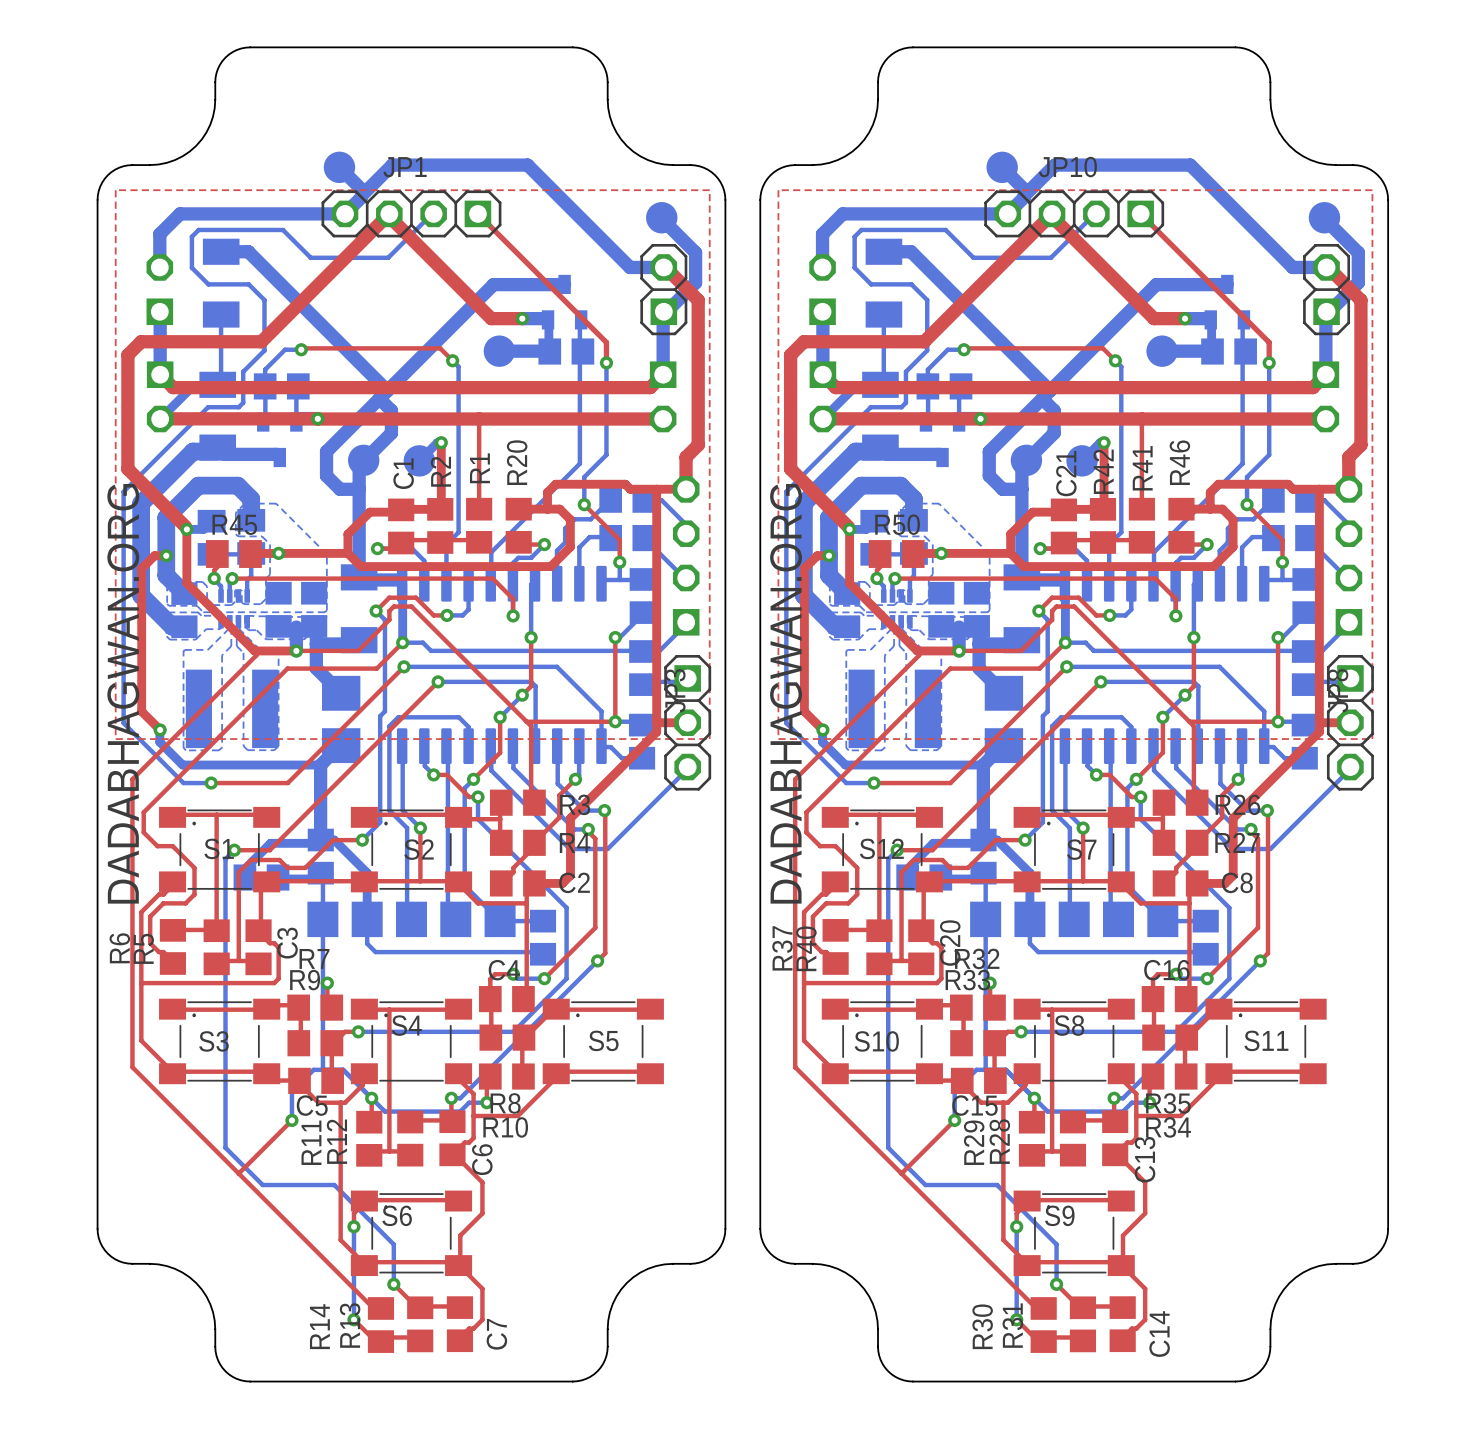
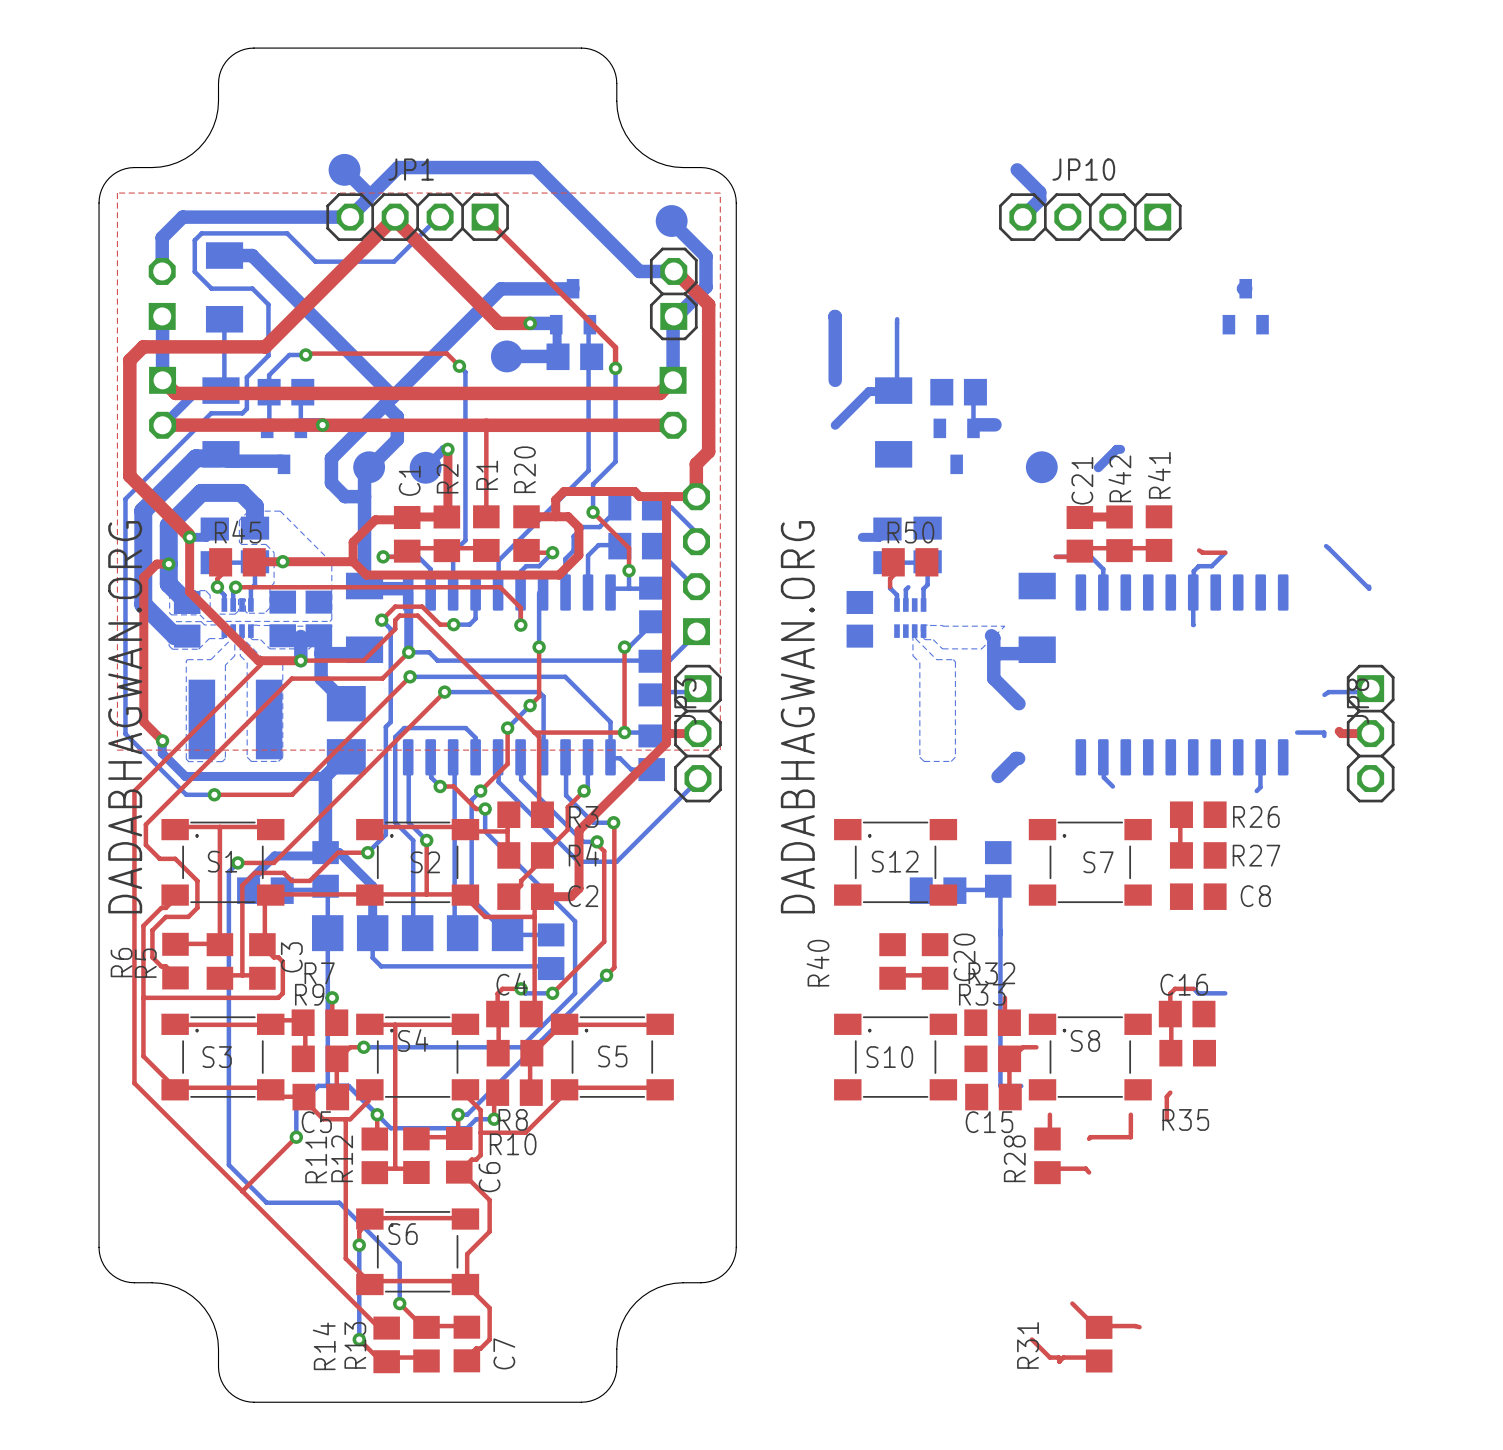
board edge: (912, 47) (1244, 48) (1256, 54) (1267, 68) (1272, 116) (1279, 132) (1289, 145) (1303, 156) (1318, 162) (1366, 167) (1380, 178) (1386, 190) (1387, 1233) (1383, 1246) (1370, 1259) (1357, 1263) (1318, 1266) (1303, 1272) (1289, 1282) (1279, 1296) (1272, 1312) (1267, 1360) (1256, 1374) (1244, 1380) (903, 1380) (891, 1374) (880, 1360) (875, 1312) (869, 1296) (858, 1282) (845, 1272) (829, 1266) (781, 1261) (767, 1250) (761, 1237) (760, 195) (764, 182) (777, 169) (790, 165) (829, 162) (845, 156) (858, 145) (869, 132) (875, 116) (878, 77) (882, 64) (895, 52) (912, 47) -> none
part: (1002, 167) -> none
top zone outline: (778, 190) (778, 739) (1372, 739) (1372, 190) (778, 190) -> none
bottom track: (1024, 195) (1055, 165) (1190, 165) (1292, 267) (1326, 267) -> none
bottom track: (1007, 213) (842, 213) (822, 234) (822, 267) -> none
bottom track: (1096, 213) (1050, 257) (973, 257) (945, 229) (861, 229) (854, 236) (854, 267) (871, 284) (911, 284) (927, 300) (927, 350) (905, 371) (905, 402) (901, 407) (870, 407) (786, 491) (786, 723) (846, 783) (873, 783) -> none
top track: (1140, 213) (1269, 342) (1269, 362) -> none
bottom track: (1324, 217) (1358, 252) (1358, 282) (1329, 311) (1325, 312) (1325, 374) -> none
part: (1324, 217) -> none
bottom track: (883, 251) (911, 251) (1050, 390) -> none
top track: (1326, 267) (1360, 300) (1360, 445) (1348, 457) (1348, 489) (1293, 489) (1288, 484) (1218, 484) (1210, 492) (1210, 509) -> none
part: (883, 283) -> none
bottom track: (1224, 284) (1156, 284) (989, 451) (989, 475) (1002, 489) (1021, 489) -> none
part: (822, 289) -> none
part: (1326, 289) -> none
bottom track: (1185, 318) (1210, 319) (1212, 351) (1162, 351) -> none
top track: (1185, 318) (1154, 318) (1052, 216) (1052, 213) (924, 341) (803, 341) (790, 355) (790, 469) (848, 526) (849, 583) (917, 650) (959, 650) -> none
via: (1185, 318) -> none
bottom track: (1243, 319) (1242, 349) (1245, 351) (1242, 354) (1242, 463) (1154, 552) (1153, 583) -> none
bottom track: (964, 349) (947, 349) (927, 369) (928, 420) (925, 422) -> none
top track: (964, 349) (1102, 348) (1115, 360) -> none
via: (964, 349) -> none
part: (1162, 351) -> none
part: (1229, 351) -> none
bottom track: (1115, 360) (1121, 366) (1121, 532) (1109, 544) (1109, 583) -> none
via: (1115, 360) -> none
bottom track: (1269, 362) (1269, 454) (1247, 477) (1247, 504) -> none
via: (1269, 362) -> none
top track: (822, 374) (835, 387) (1312, 387) (1325, 374) -> none
part: (822, 396) -> none
part: (1325, 396) -> none
bottom track: (1042, 398) (1054, 410) (1054, 433) (1026, 460) (1028, 460) (1021, 467) (1021, 577) (1025, 579) (1060, 579) (1065, 584) (1065, 642) (1085, 642) (1093, 650) (1322, 650) (1348, 622) -> none
top track: (823, 418) (980, 418) -> none
via: (980, 418) -> none
top track: (980, 419) (1325, 419) -> none
top track: (1141, 419) (1141, 509) -> none
top track: (1104, 442) (1104, 505) (1100, 509) (1065, 509) (1061, 512) (1032, 512) (1010, 534) (1010, 553) -> none
via: (1104, 442) -> none
bottom track: (942, 457) (940, 454) (886, 454) (880, 447) (879, 451) (855, 451) (803, 503) (803, 595) (835, 626) (847, 626) (838, 626) -> none
part: (1082, 460) -> none
top track: (1319, 489) (1319, 732) (1233, 818) (1233, 875) (1225, 883) (1197, 883) (1189, 890) (1189, 996) (1186, 999) -> none
bottom track: (1273, 499) (1253, 519) (1237, 519) (1227, 528) (1227, 542) (1219, 550) (1219, 583) -> none
part: (1289, 499) -> none
bottom track: (1306, 499) (1324, 500) (1348, 524) (1348, 533) -> none
bottom zone outline: (907, 503) (938, 503) (989, 554) (989, 610) (987, 612) (866, 612) (859, 605) (831, 605) (829, 604) (829, 584) (832, 581) (865, 581) (869, 586) (869, 599) (875, 605) (894, 605) (897, 601) (897, 590) (904, 590) (904, 602) (906, 604) (923, 604) (928, 598) (928, 578) (932, 574) (932, 544) (924, 536) (900, 536) (898, 534) (898, 512) (907, 503) -> none
top track: (1247, 504) (1282, 540) (1282, 562) -> none
via: (1247, 504) -> none
top track: (1181, 509) (1222, 509) (1233, 519) (1233, 547) (1213, 566) (1023, 566) (1010, 553) -> none
bottom track: (913, 520) (913, 499) (900, 485) (861, 485) (829, 517) (829, 575) (847, 593) -> none
R46: (1181, 525) -> none
via: (849, 529) -> none
bottom track: (1273, 538) (1252, 537) (1242, 547) (1242, 583) -> none
part: (1289, 538) -> none
via: (1207, 544) -> none
via: (1040, 548) -> none
via: (941, 553) -> none
top track: (829, 555) (817, 555) (804, 568) (804, 711) (822, 729) -> none
via: (829, 555) -> none
part: (1348, 555) -> none
bottom track: (1282, 562) (1282, 579) -> none
via: (1282, 562) -> none
via: (876, 578) -> none
top track: (894, 578) (1155, 578) (1175, 599) (1175, 615) -> none
via: (894, 578) -> none
bottom track: (1305, 579) (1264, 579) (1264, 583) -> none
bottom track: (1131, 583) (1131, 609) (1125, 615) (1109, 615) -> none
bottom track: (1197, 583) (1193, 584) (1193, 637) -> none
part: (1305, 596) -> none
part: (941, 609) -> none
part: (976, 609) -> none
bottom track: (1038, 611) (1047, 619) (1047, 711) (1042, 716) (1042, 822) (1025, 840) -> none
top track: (1038, 611) (1052, 597) (1078, 597) (1096, 615) (1109, 615) -> none
via: (1038, 611) -> none
bottom zone outline: (832, 612) (860, 612) (864, 615) (885, 615) (885, 626) (882, 629) (868, 629) (858, 639) (832, 639) (829, 636) (829, 615) (832, 612) -> none
bottom track: (1305, 612) (1282, 637) (1278, 637) -> none
via: (1109, 615) -> none
via: (1175, 615) -> none
bottom zone outline: (890, 616) (894, 616) (894, 646) (884, 655) (884, 747) (881, 750) (848, 750) (846, 747) (846, 651) (870, 649) (890, 629) (890, 616) -> none
bottom track: (959, 627) (959, 650) -> none
top track: (1193, 637) (1193, 686) (1185, 695) -> none
via: (1193, 637) -> none
top track: (1278, 637) (1278, 721) (1189, 721) -> none
via: (1278, 637) -> none
top track: (1065, 642) (1039, 668) (950, 668) (806, 812) (806, 832) (820, 846) (835, 846) (857, 867) (857, 894) (848, 903) (826, 903) (812, 916) (812, 943) (821, 952) (826, 952) (835, 963) -> none
via: (1065, 642) -> none
top track: (919, 650) (919, 655) (795, 779) (795, 1067) (1034, 1306) (1043, 1306) (1043, 1308) -> none
top track: (959, 650) (1021, 650) (1052, 619) (1052, 611) (1056, 606) (1074, 606) (1193, 726) (1193, 801) (1197, 802) -> none
via: (959, 650) -> none
bottom track: (1066, 666) (1219, 666) (1264, 711) (1264, 746) (1273, 747) (1284, 758) (1304, 758) -> none
top track: (1066, 666) (950, 783) (873, 783) -> none
via: (1066, 666) -> none
part: (1304, 668) -> none
bottom track: (1100, 681) (1193, 681) (1198, 686) (1197, 746) -> none
top track: (1100, 681) (932, 850) (897, 850) -> none
via: (1100, 681) -> none
bottom track: (1185, 695) (1162, 717) -> none
via: (1185, 695) -> none
part: (894, 708) -> none
top track: (1162, 717) (1162, 752) (1136, 779) -> none
via: (1162, 717) -> none
part: (1003, 719) -> none
via: (1278, 721) -> none
bottom track: (822, 729) (822, 742) (845, 765) (983, 765) (983, 839) -> none
via: (822, 729) -> none
part: (1304, 741) -> none
bottom track: (1064, 746) (1065, 810) (1083, 828) -> none
bottom track: (1109, 746) (1110, 914) (1118, 919) -> none
bottom track: (1131, 746) (1131, 726) (1121, 717) (1060, 717) (1052, 726) (1052, 810) (1069, 828) (1069, 916) (1074, 919) -> none
bottom track: (1153, 746) (1154, 770) (1232, 849) (1270, 849) (1350, 767) -> none
bottom track: (1175, 746) (1176, 768) (1237, 829) (1251, 829) -> none
bottom track: (1219, 746) (1220, 783) (1247, 810) (1267, 810) -> none
top track: (1096, 774) (1109, 774) (1131, 797) (1140, 797) -> none
via: (1096, 774) -> none
bottom track: (1136, 779) (1127, 788) (1127, 885) (1162, 921) (1205, 921) -> none
via: (1136, 779) -> none
top track: (1238, 779) (1222, 795) (1222, 817) (1198, 841) (1198, 845) (1176, 867) (1176, 872) (1164, 883) -> none
via: (1238, 779) -> none
via: (873, 783) -> none
bottom track: (1140, 797) (1140, 819) (1229, 907) (1229, 978) (1176, 1031) (1021, 1031) -> none
via: (1140, 797) -> none
top track: (1267, 810) (1268, 953) (1260, 960) -> none
via: (1267, 810) -> none
top track: (879, 814) (879, 929) -> none
top track: (835, 817) (839, 814) (928, 814) (929, 817) -> none
top track: (1027, 817) (1029, 814) (1118, 814) (1123, 819) (1162, 819) -> none
top track: (1083, 828) (1083, 881) -> none
via: (1083, 828) -> none
top track: (1251, 829) (1258, 838) (1258, 927) (1207, 978) -> none
via: (1251, 829) -> none
top track: (1025, 840) (995, 840) (967, 867) (950, 867) (942, 860) (913, 860) (901, 872) (901, 960) -> none
via: (1025, 840) -> none
bottom track: (897, 850) (888, 859) (888, 1147) (925, 1185) (997, 1185) (1056, 1244) (1056, 1284) -> none
via: (897, 850) -> none
bottom track: (907, 877) (907, 868) (933, 843) (980, 843) (983, 840) (996, 840) (1029, 872) (1029, 943) (1038, 952) (1202, 952) (1205, 954) -> none
top track: (835, 881) (835, 885) (826, 894) (821, 894) (804, 912) (804, 1040) (835, 1073) (839, 1071) (928, 1071) (936, 1080) (962, 1080) (963, 1084) (981, 1102) (1007, 1102) (1025, 1084) (1027, 1073) -> none
top track: (1189, 903) (1140, 903) (1118, 881) (932, 881) (929, 881) (923, 890) (923, 929) (921, 930) (932, 943) (936, 943) (941, 947) (941, 978) (936, 983) (804, 983) -> none
part: (1074, 919) -> none
top track: (879, 929) (835, 930) -> none
part: (1205, 937) -> none
R37: (835, 946) -> none
bottom track: (1260, 960) (1123, 1098) (1114, 1098) -> none
via: (1260, 960) -> none
via: (1176, 974) -> none
via: (1207, 978) -> none
via: (990, 983) -> none
top track: (835, 1009) (928, 1009) (932, 1005) (959, 1005) (963, 1009) (963, 1040) (961, 1043) -> none
top track: (1027, 1009) (1121, 1009) -> none
top track: (1052, 1009) (1052, 1151) -> none
top track: (1313, 1009) (1216, 1009) (1185, 1040) (1186, 1076) -> none
via: (1021, 1031) -> none
S11: (1266, 1041) -> none
top track: (1121, 1073) (1118, 1076) (1136, 1093) (1136, 1138) (1131, 1142) (1127, 1142) (1115, 1154) (1118, 1155) (1145, 1182) (1145, 1213) (1123, 1235) (1123, 1262) (1121, 1265) -> none
top track: (1313, 1073) (1309, 1071) (1220, 1071) (1220, 1076) (1180, 1116) (1136, 1116) -> none
R34: (1169, 1076) -> none
via: (1034, 1098) -> none
via: (1114, 1098) -> none
top track: (1003, 1102) (1003, 1240) (1027, 1265) (1029, 1262) (1118, 1262) (1121, 1265) -> none
bottom track: (1149, 1102) (1131, 1102) (1123, 1111) (1047, 1111) (1005, 1069) (976, 1069) (954, 1091) (954, 1120) -> none
via: (1149, 1102) -> none
top track: (954, 1120) (901, 1173) -> none
via: (954, 1120) -> none
R29: (1072, 1138) -> none
C13: (1115, 1138) -> none
top track: (1121, 1201) (1029, 1200) (1016, 1213) (1016, 1226) -> none
bottom track: (1016, 1226) (1016, 1319) -> none
via: (1016, 1226) -> none
S9: (1074, 1233) -> none
top track: (1121, 1265) (1145, 1288) (1145, 1319) (1136, 1328) (1131, 1328) (1123, 1337) (1122, 1340) -> none
via: (1056, 1284) -> none
via: (1016, 1319) -> none
C14: (1122, 1324) -> none
R30: (1043, 1325) -> none

